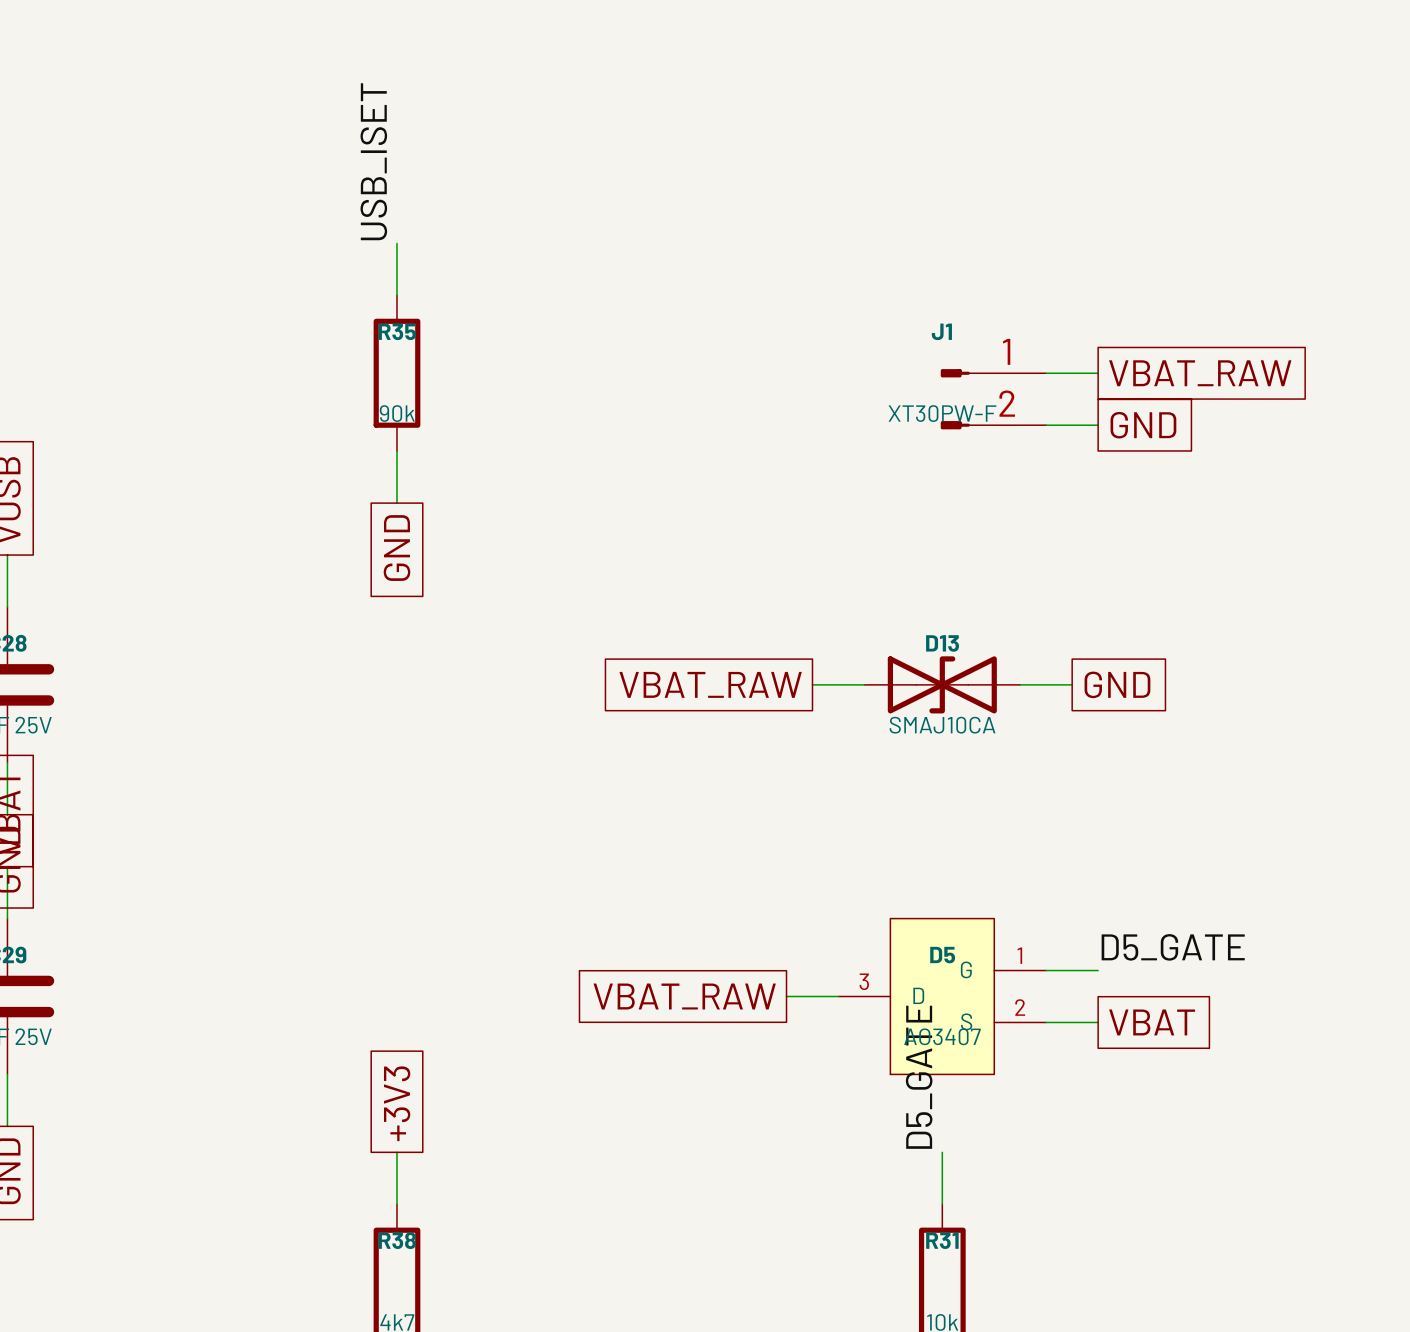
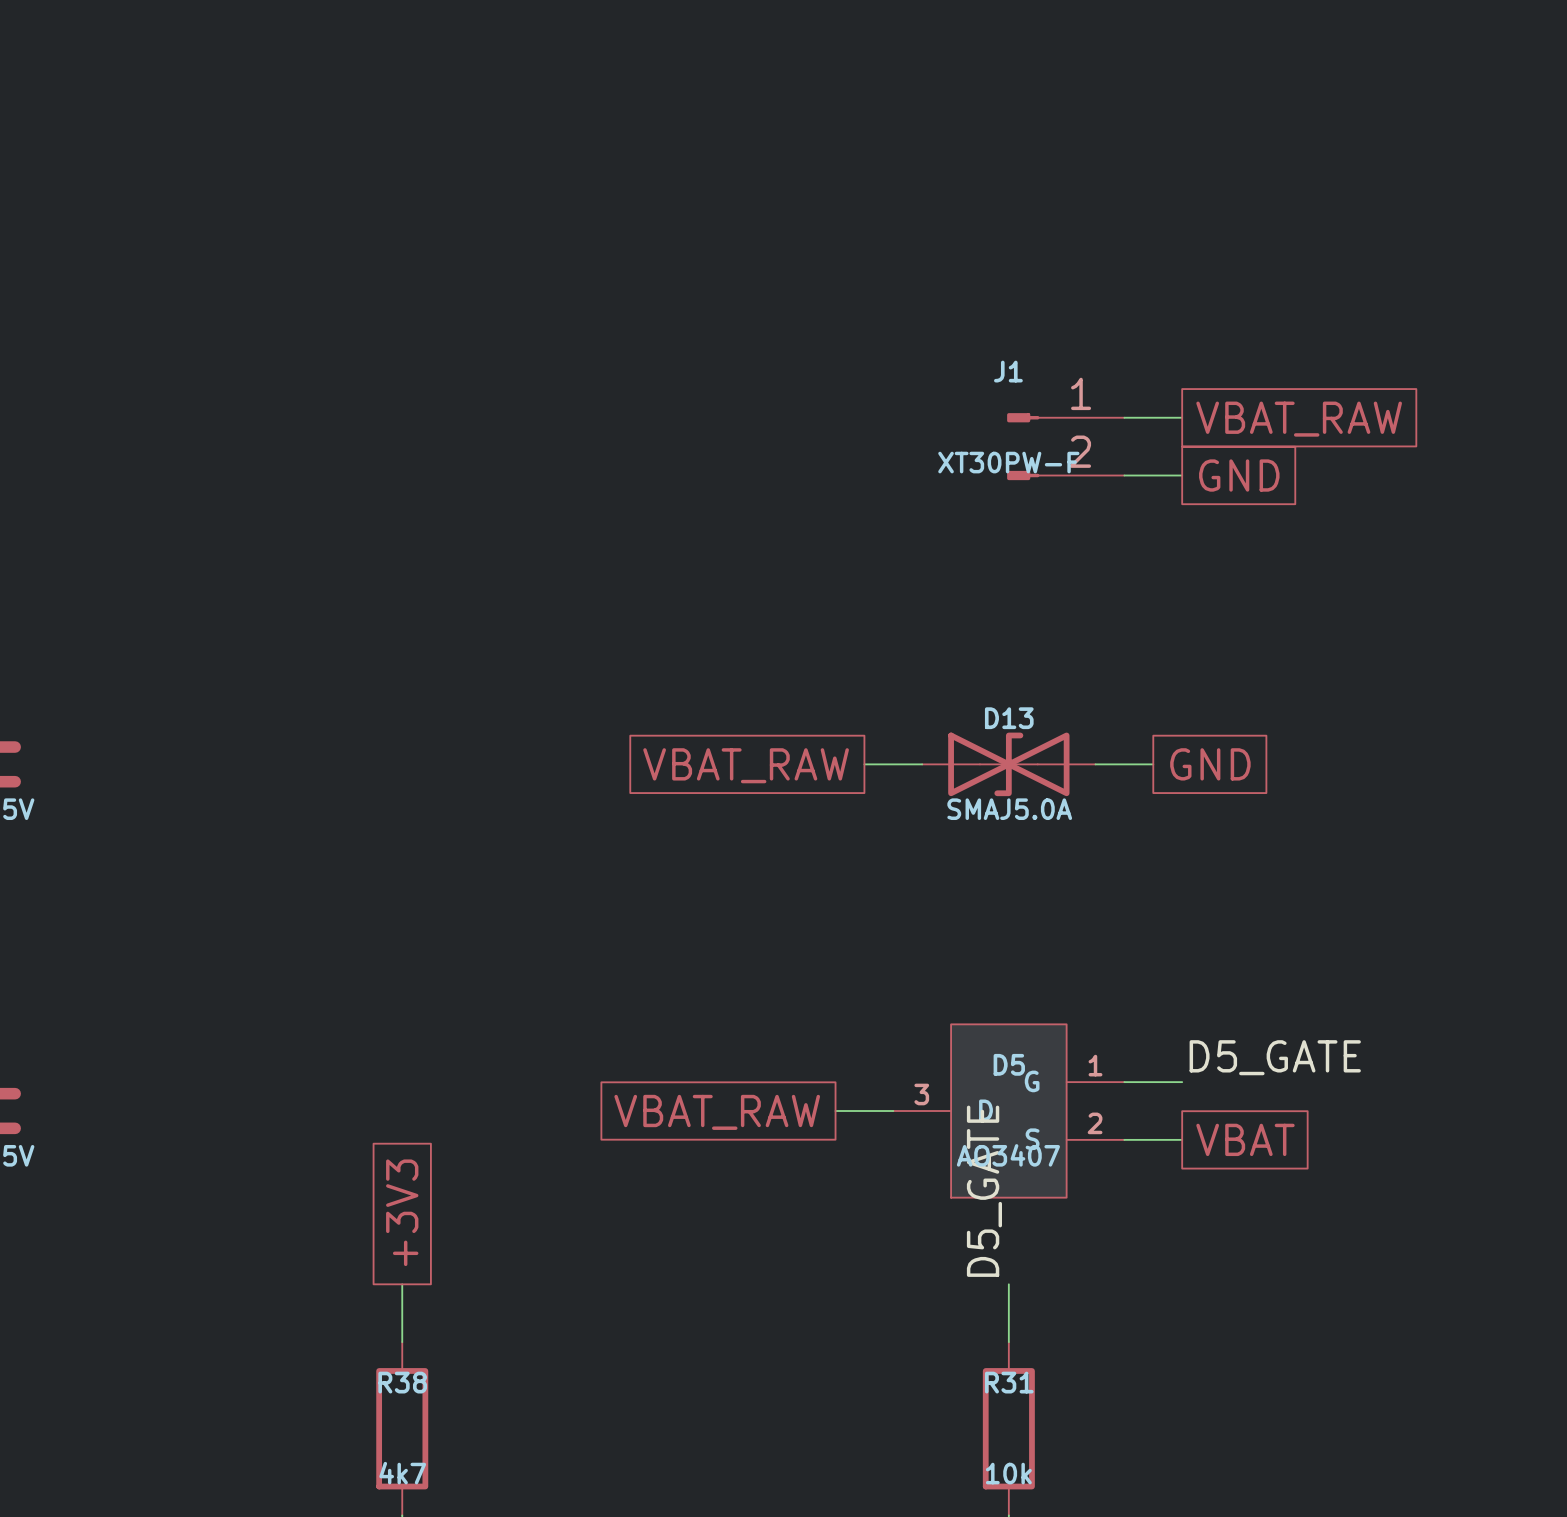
label: USB_ISET (373, 161) -> none
wire: (396, 243) (396, 295) -> none
R35: 90k (396, 373) -> none
wire: (396, 451) (396, 503) -> none
global label: GND (396, 548) -> none
D13 value: SMAJ10CA (942, 725) -> SMAJ5.0A (1009, 809)

